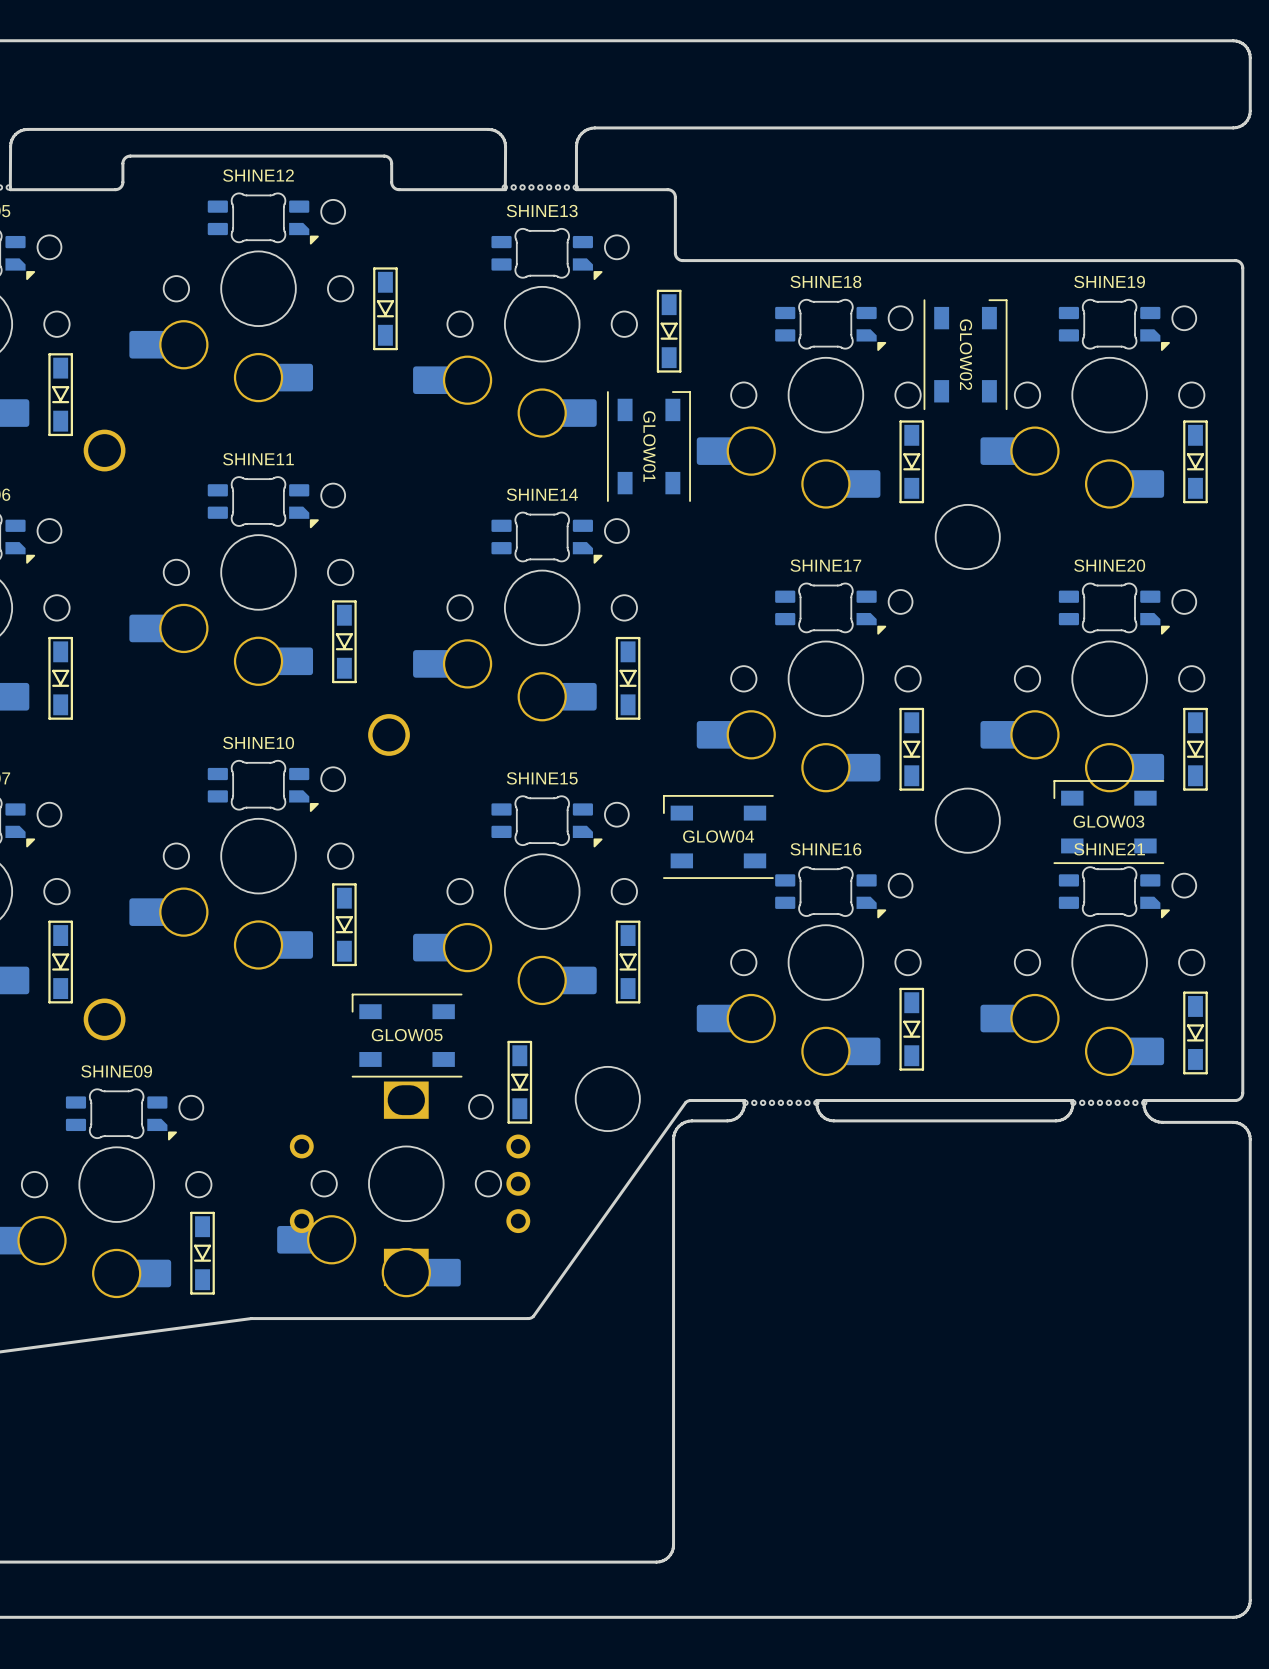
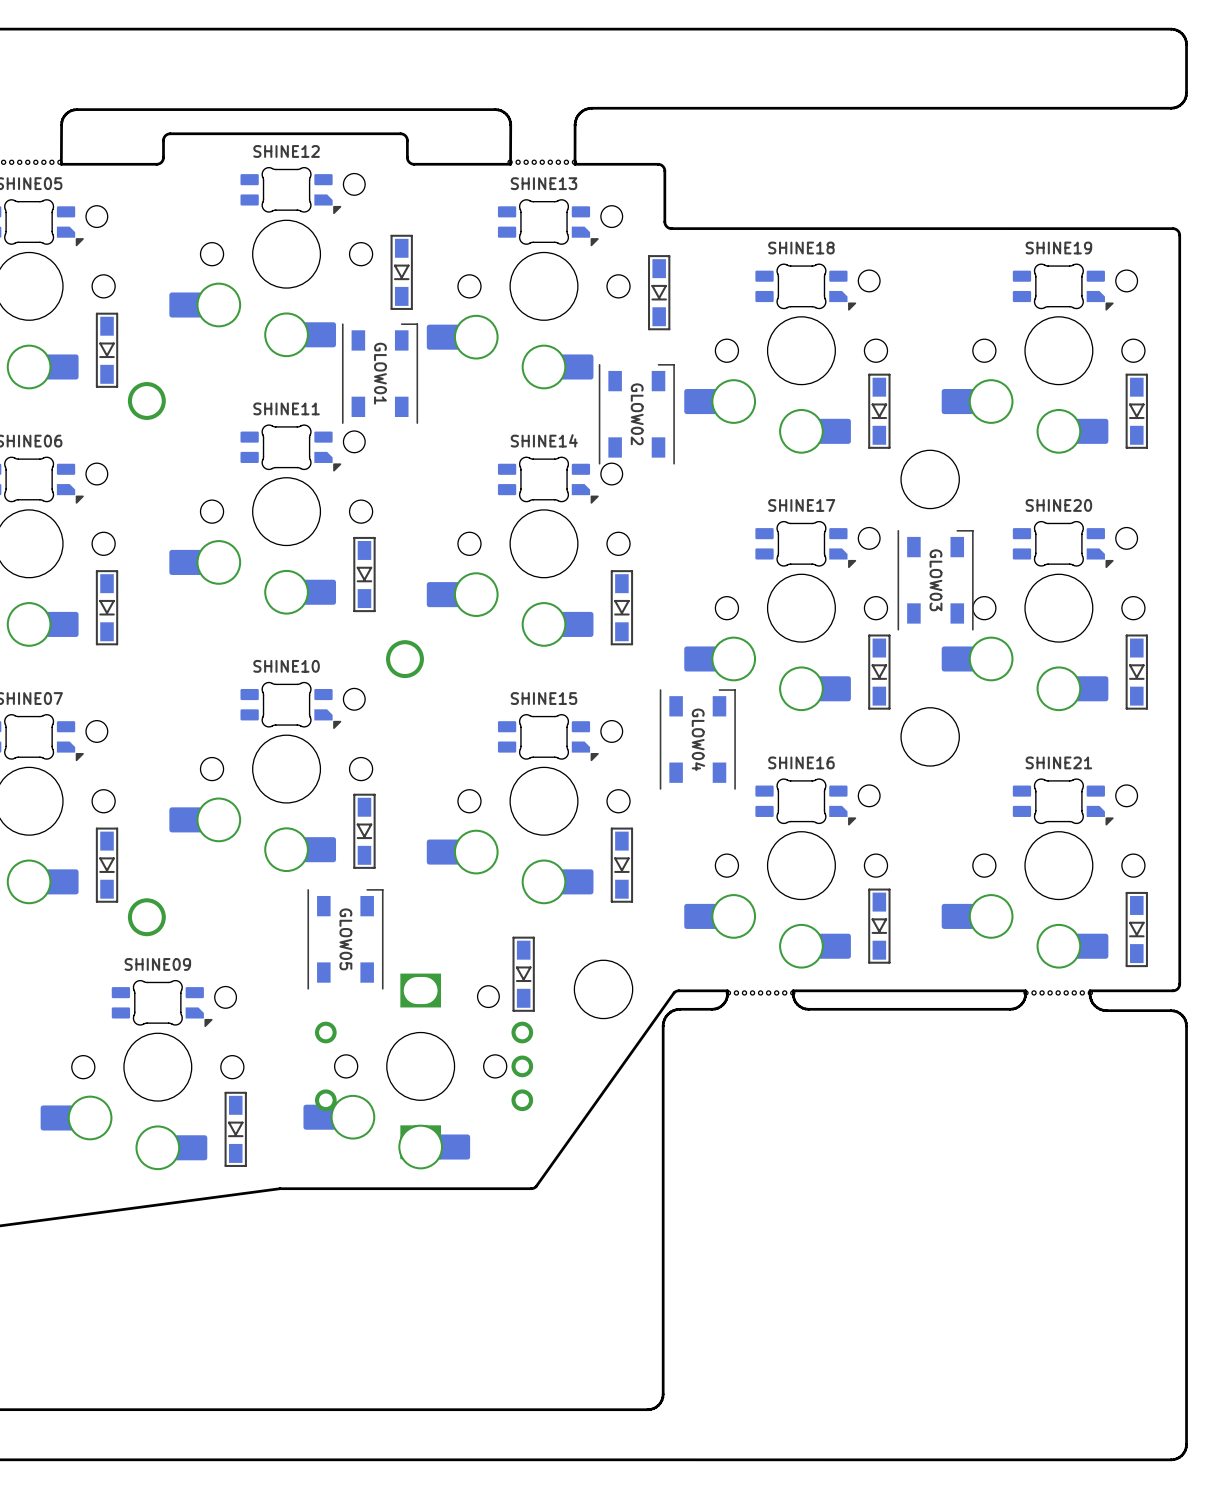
GLOW02 position: (965, 354) -> (636, 414)
GLOW01 position: (648, 446) -> (380, 373)
GLOW03 rotation: 0° (1108, 822) -> 90° clockwise (935, 580)
GLOW03 position: (1108, 822) -> (935, 580)
GLOW04 rotation: 0° (718, 836) -> 90° clockwise (697, 739)
GLOW05 rotation: 0° (407, 1035) -> 90° clockwise (345, 939)
GLOW05 position: (407, 1035) -> (345, 939)

